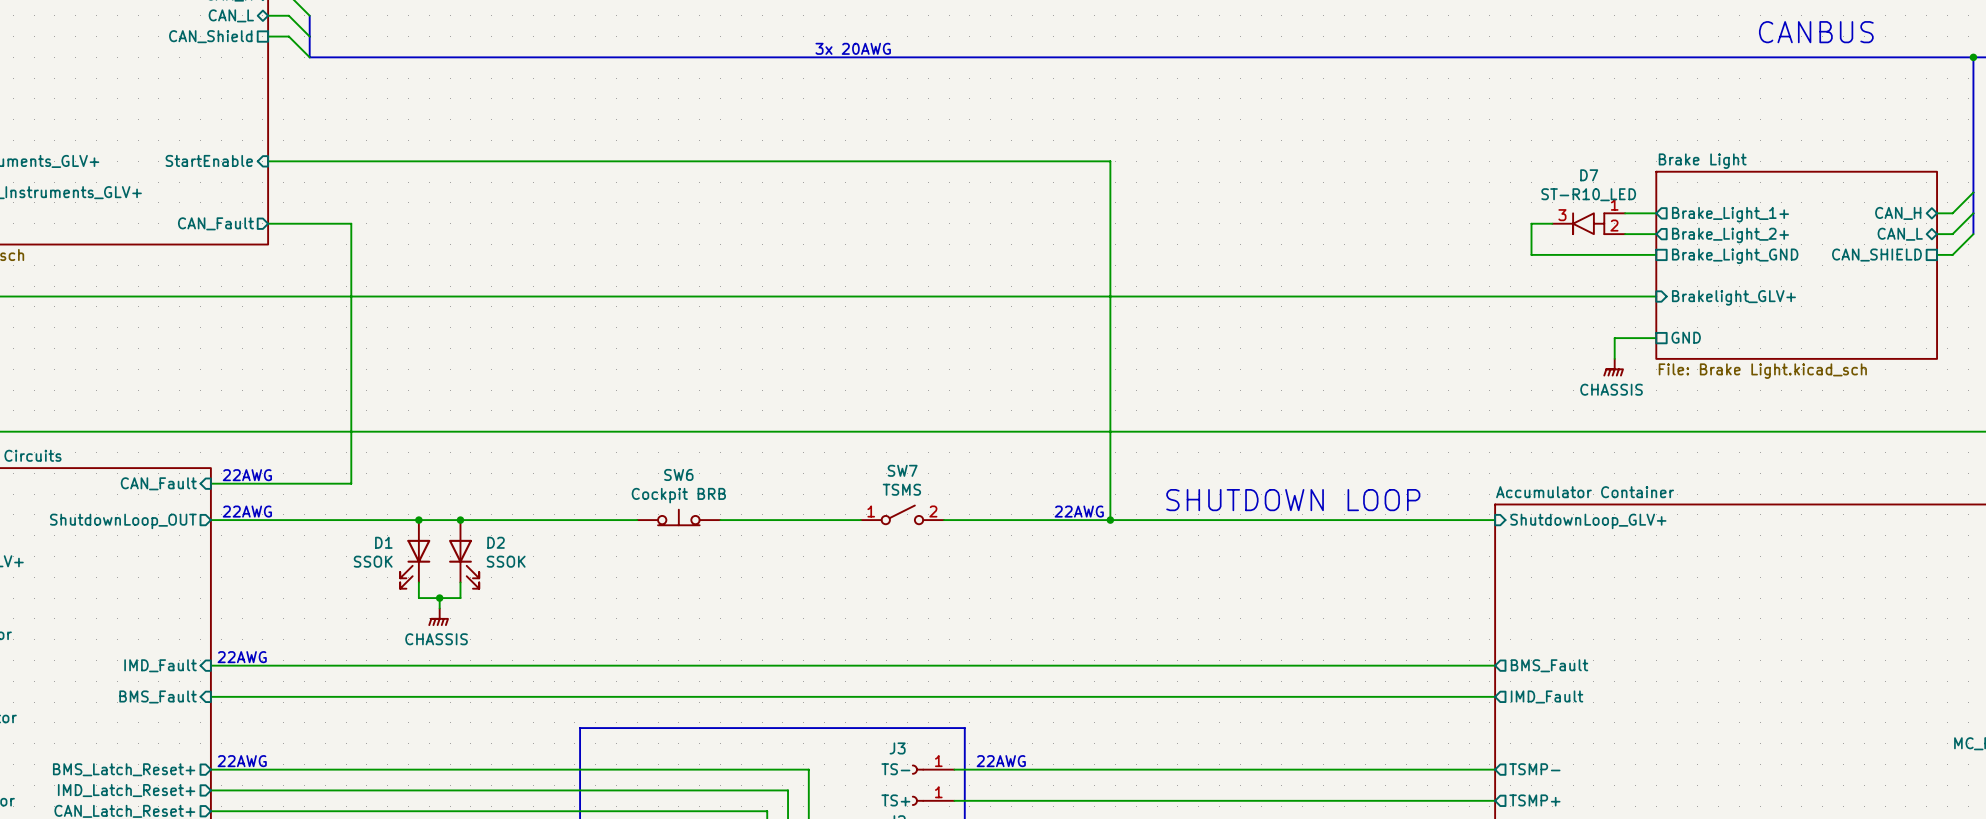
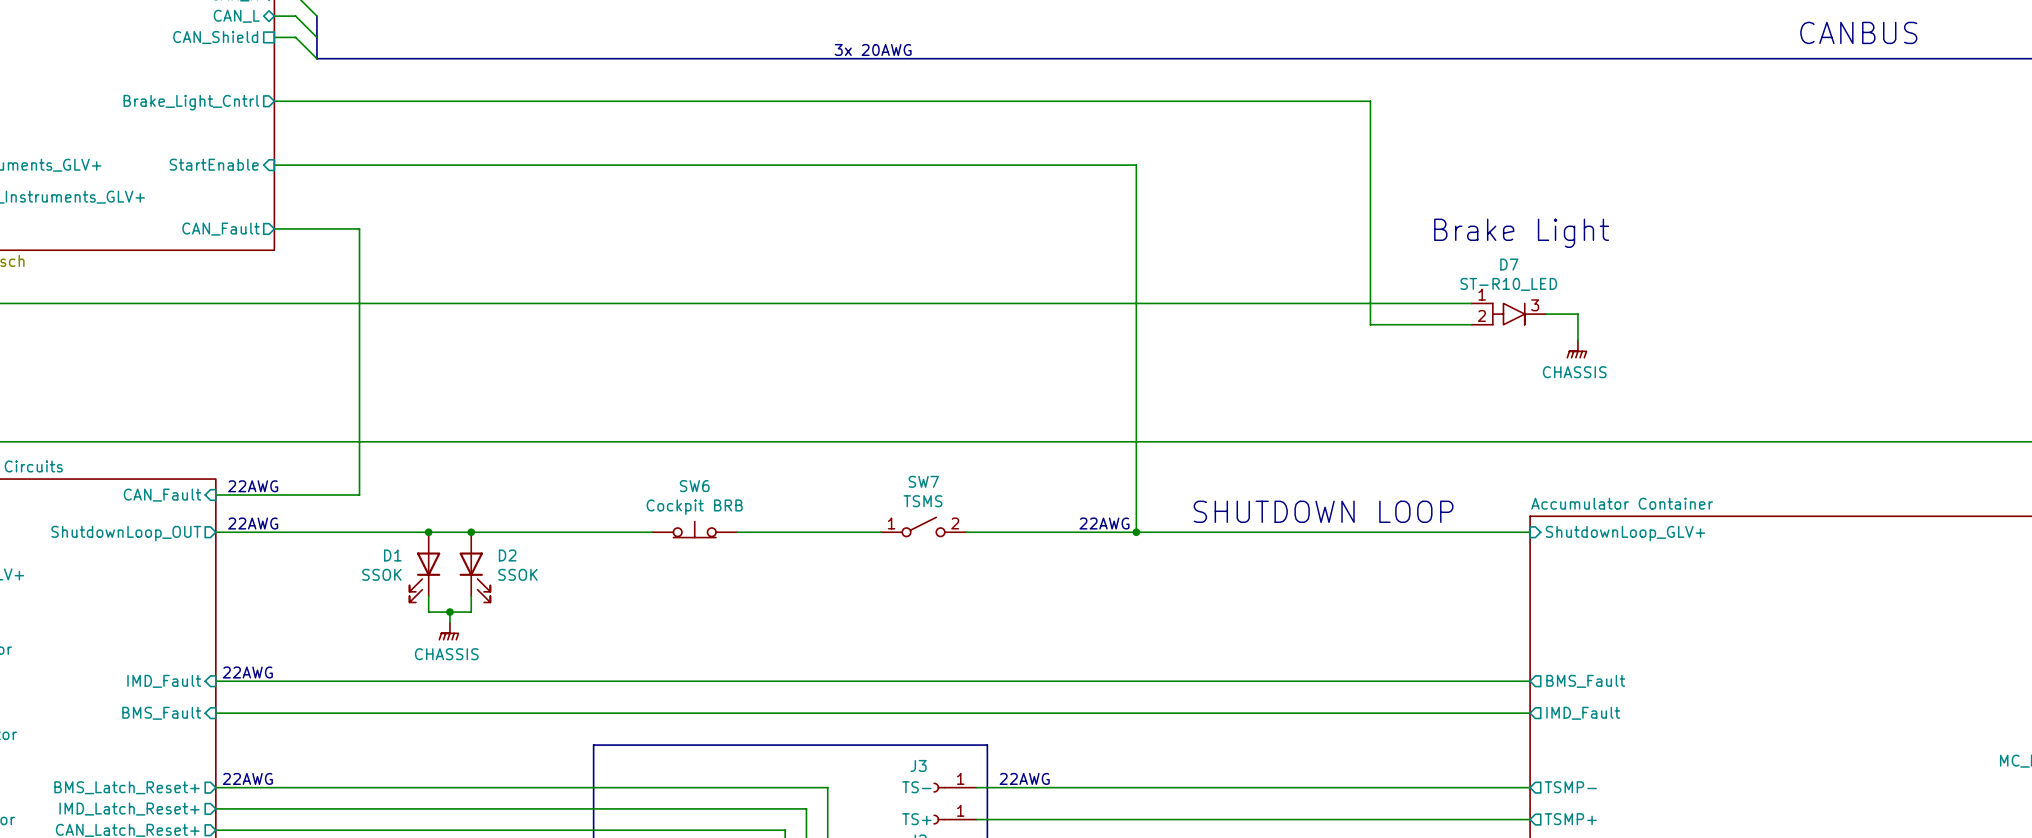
bus: (1973, 57) (1973, 234) -> none
junction: (1973, 57) -> none
wire: none -> (274, 101) (1370, 101) (1370, 324) (1471, 324)
sheet pin: none -> Brake_Light_Cntrl (191, 102)
wire: (1973, 192) (1952, 213) (1937, 213) -> none
wire: (1625, 213) (1656, 213) -> none
sheet pin: CAN_H (1898, 213) -> none
wire: (1973, 213) (1952, 234) (1937, 234) -> none
sheet pin: Brake_Light_1+ (1730, 214) -> none
wire: (1552, 223) (1531, 223) (1531, 254) (1656, 254) -> none
D7 flip: as is (1588, 223) -> left-right (1508, 314)
D7 position: (1588, 223) -> (1508, 314)
text: none -> Brake Light (1521, 233)
wire: (1625, 234) (1656, 234) -> none
sheet pin: CAN_L (1900, 234) -> none
wire: (1973, 234) (1952, 254) (1937, 254) -> none
sheet pin: Brake_Light_2+ (1730, 235) -> none
sheet pin: CAN_SHIELD (1876, 255) -> none
sheet pin: Brake_Light_GND (1735, 256) -> none
sheet Brake Light: File: Brake Light.kicad_sch (1796, 265) -> none
wire: (1437, 296) (1656, 296) -> none
sheet pin: Brakelight_GLV+ (1733, 297) -> none
wire: none -> (1546, 314) (1577, 314) (1577, 340)
sheet pin: GND (1686, 337) -> none
wire: (1656, 338) (1614, 338) (1614, 358) -> none
part position: (1613, 367) -> (1576, 349)

